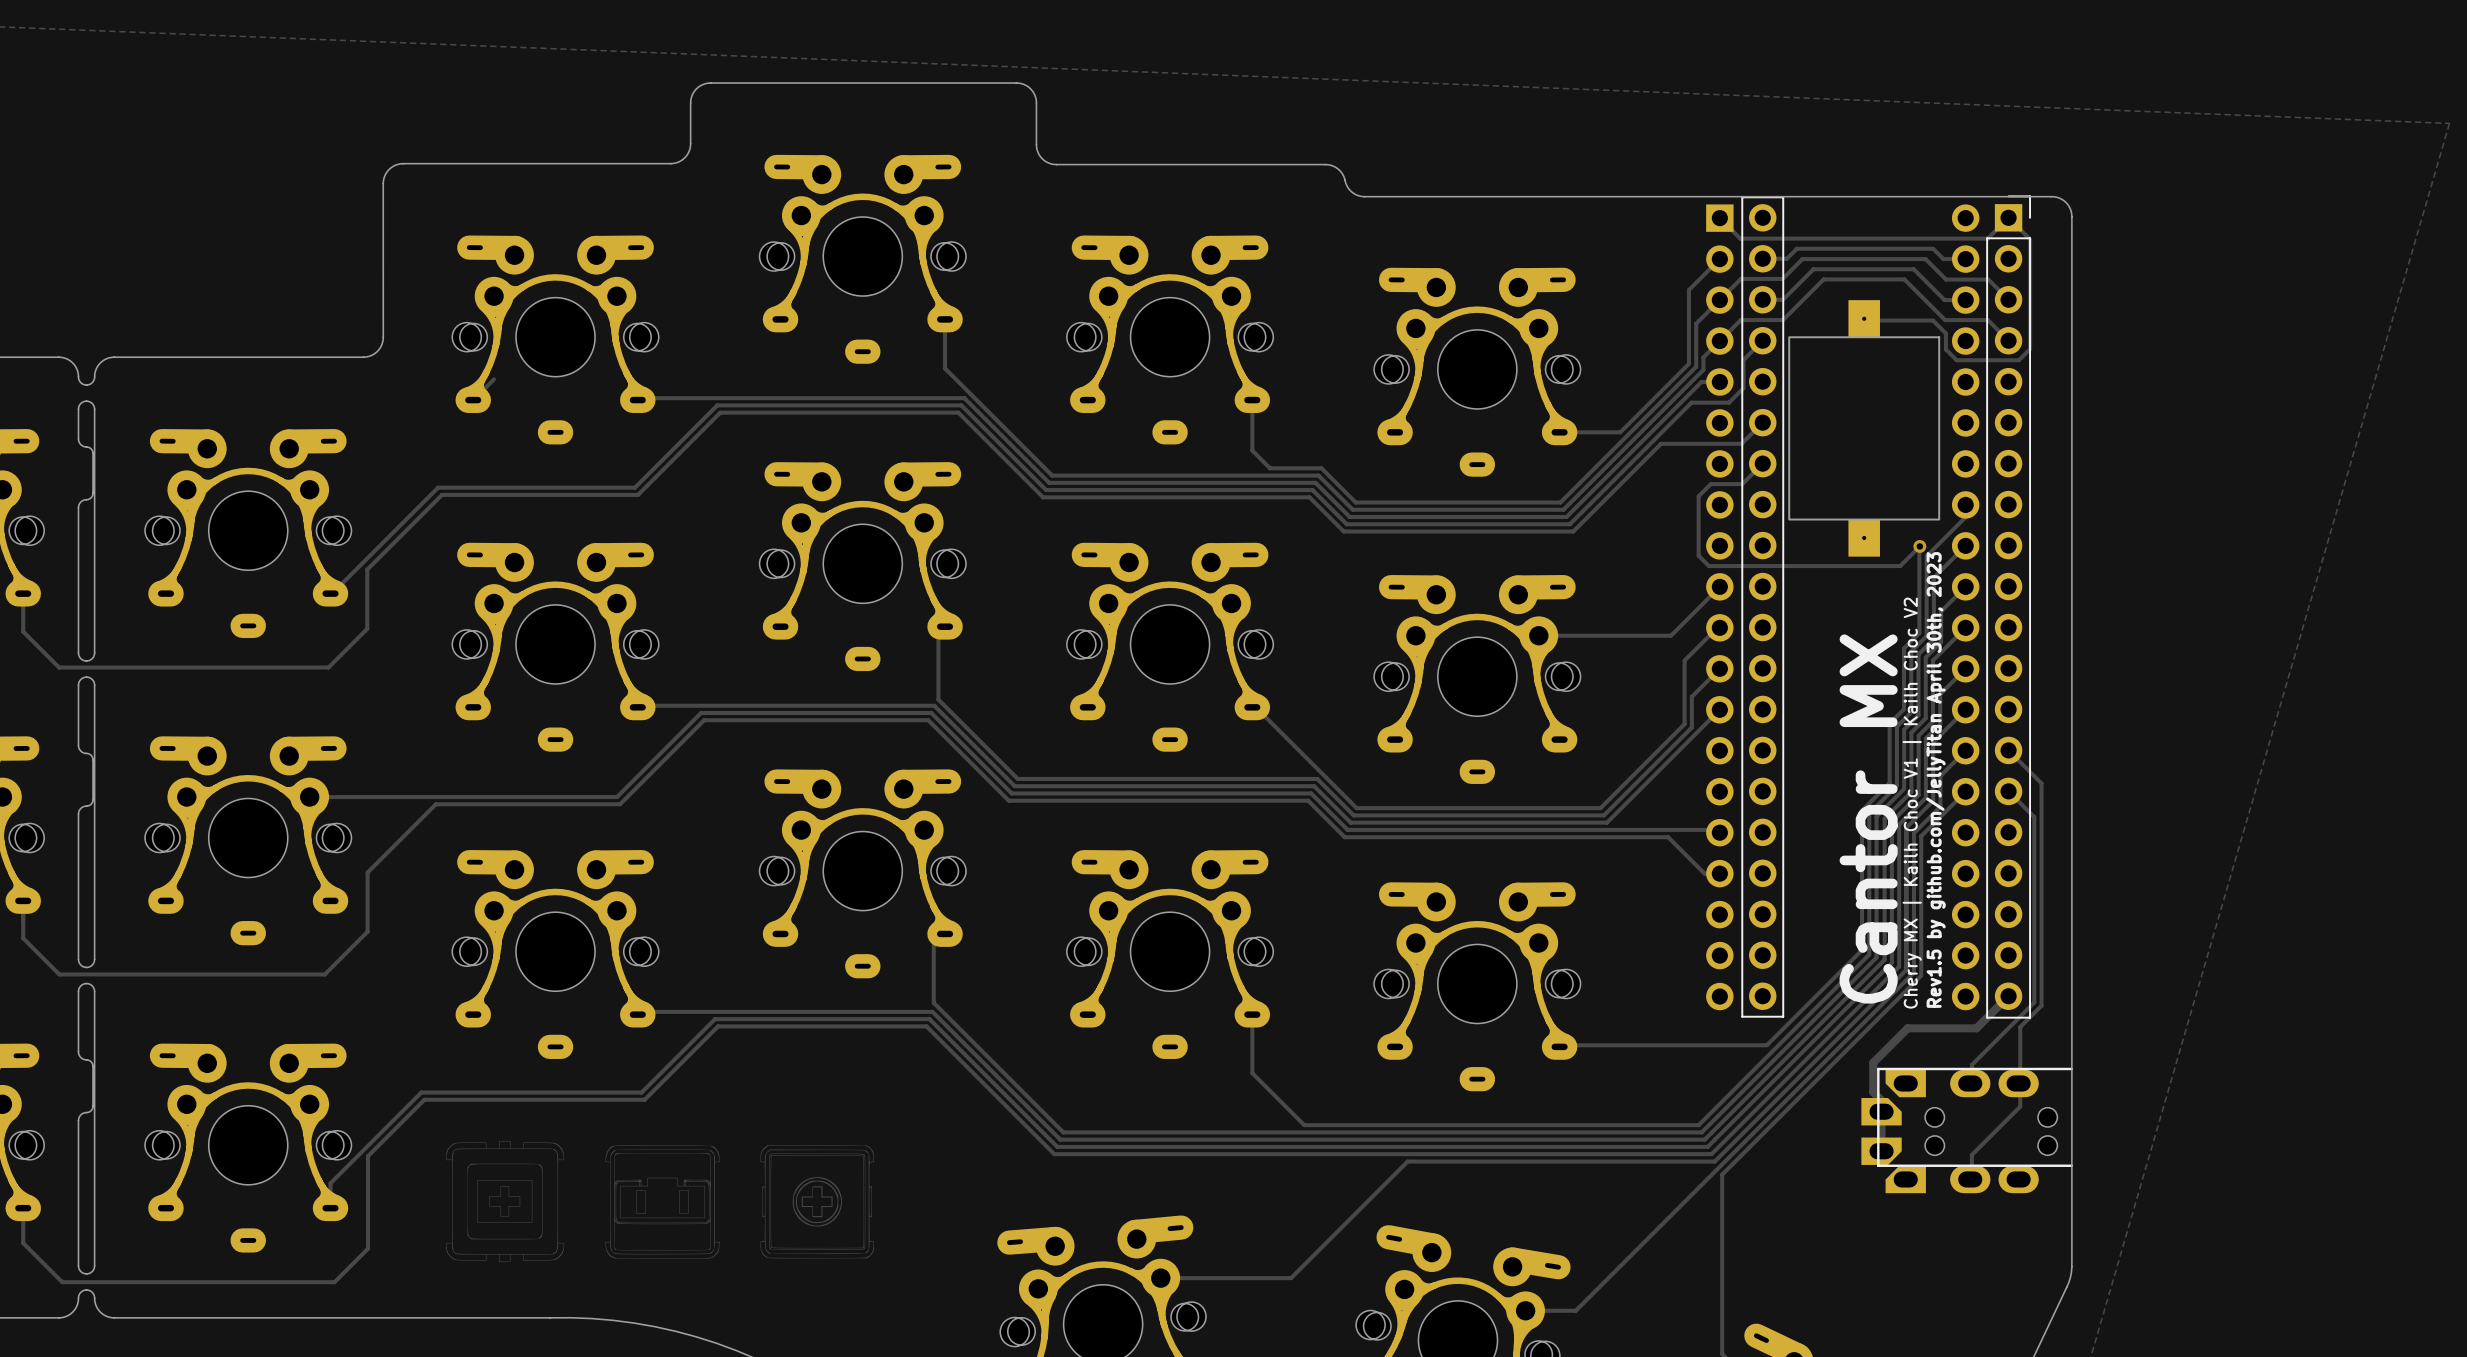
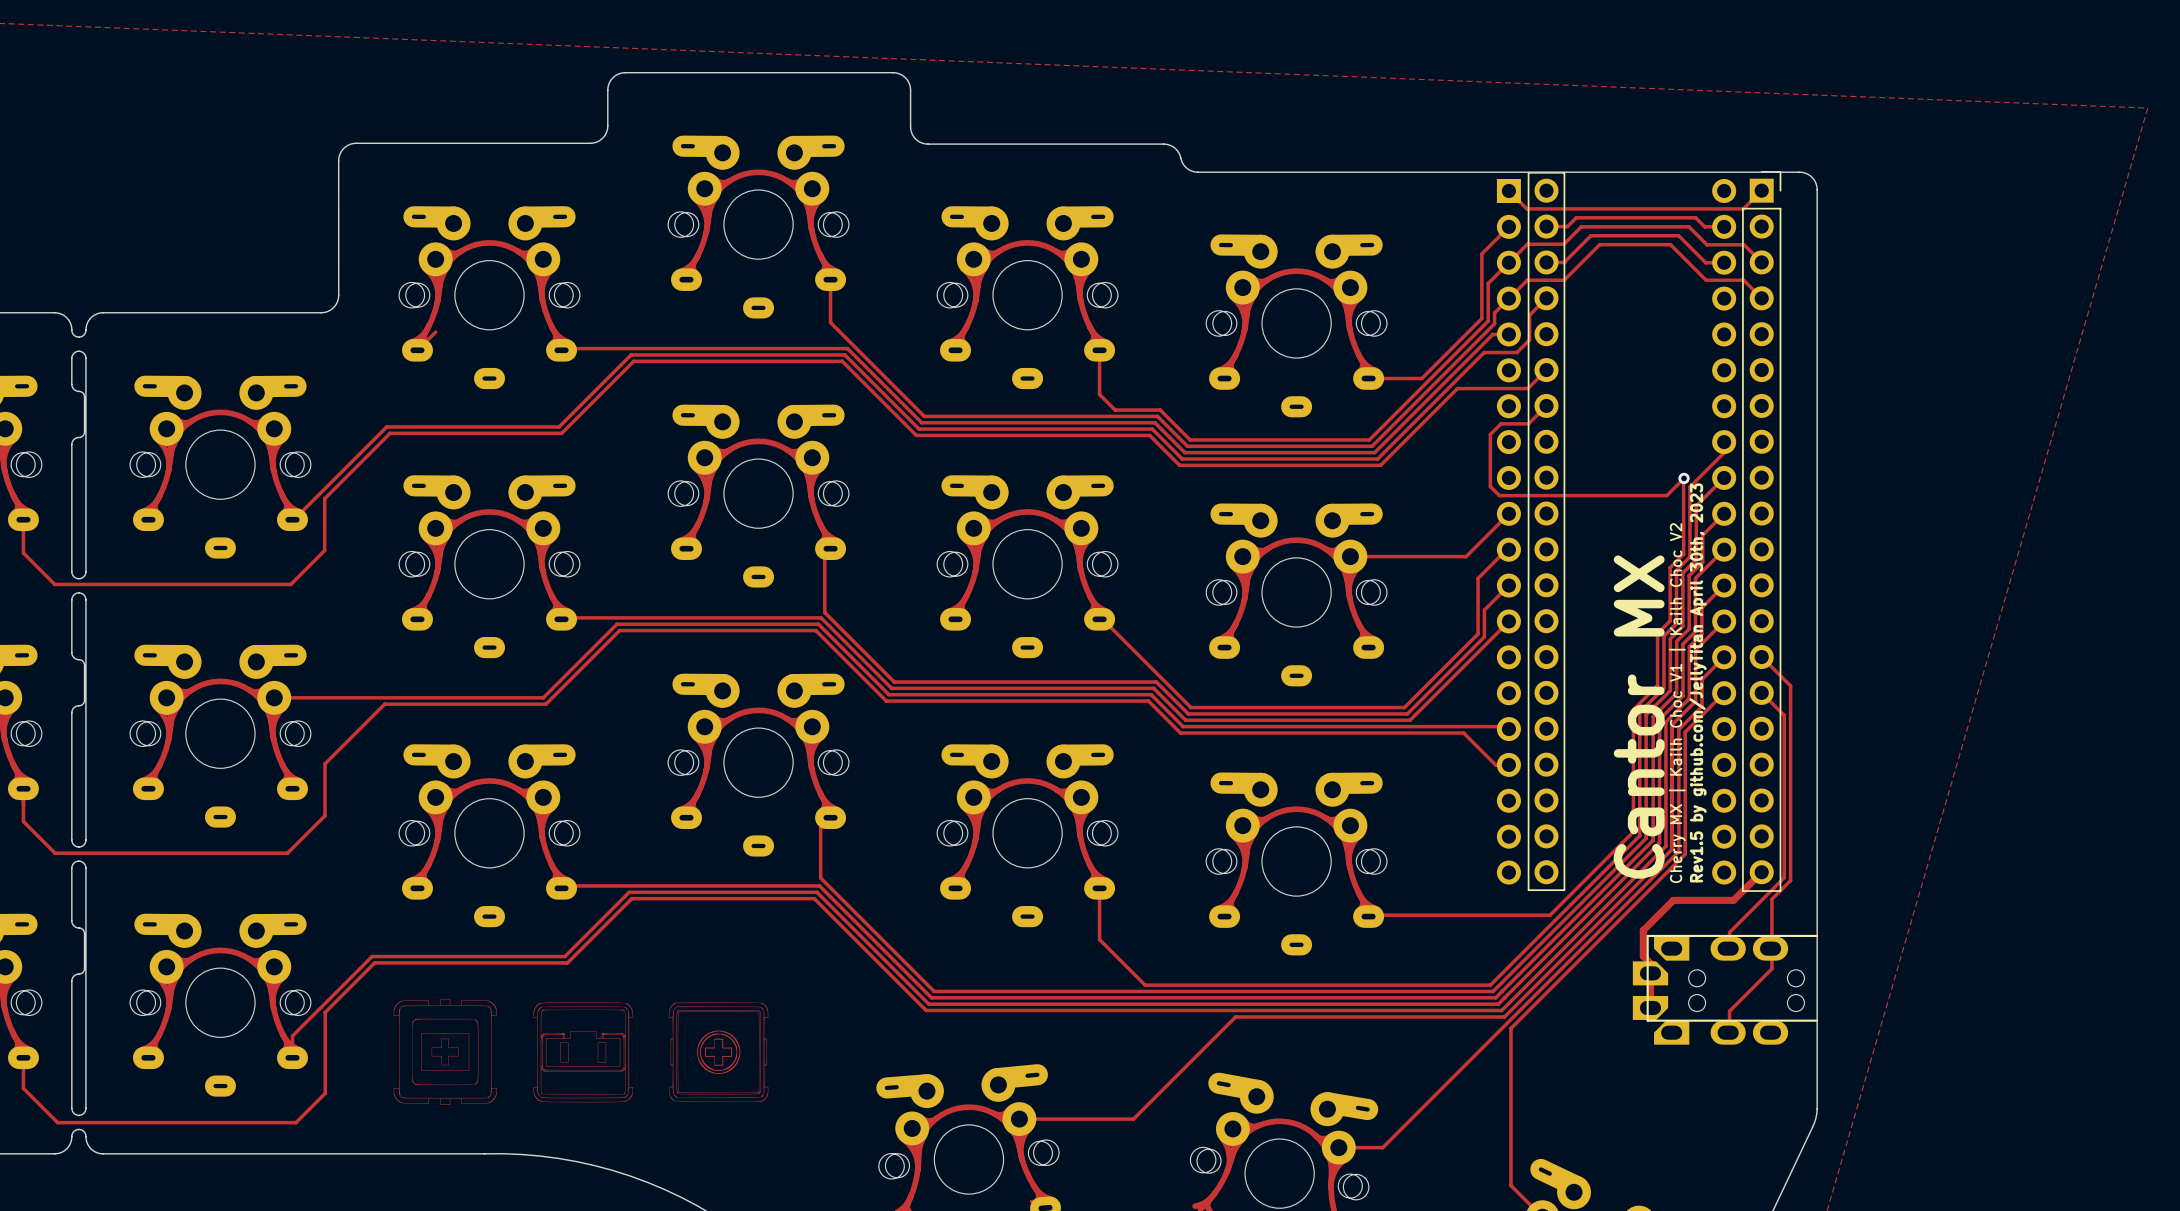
track: (2008, 217) (2030, 239) (2030, 349) (2018, 360) (1956, 360) (1945, 349) (1945, 333) (1933, 320) (1865, 320) -> none
part: (1864, 428) -> none

